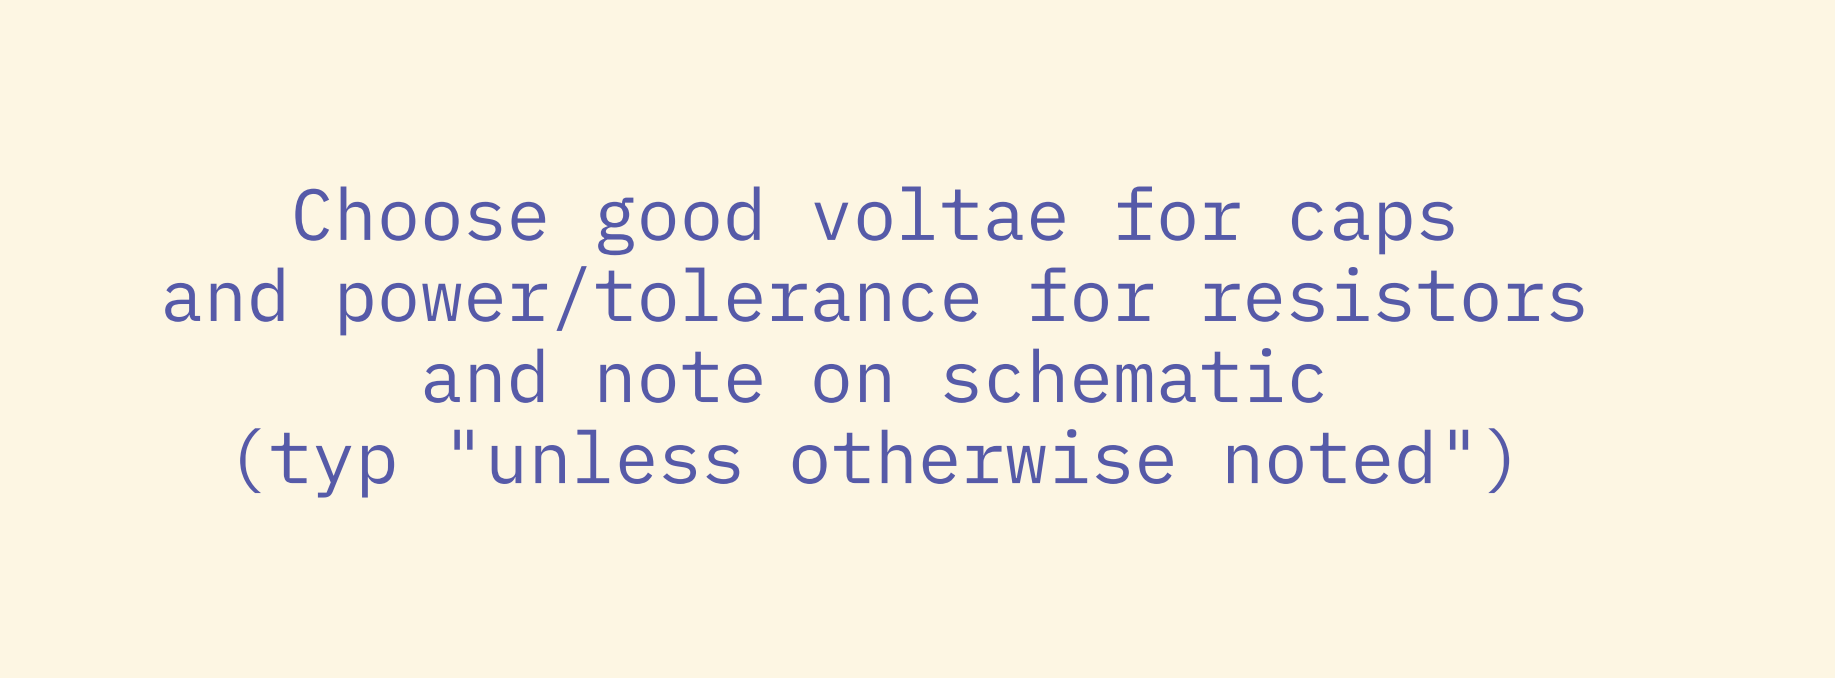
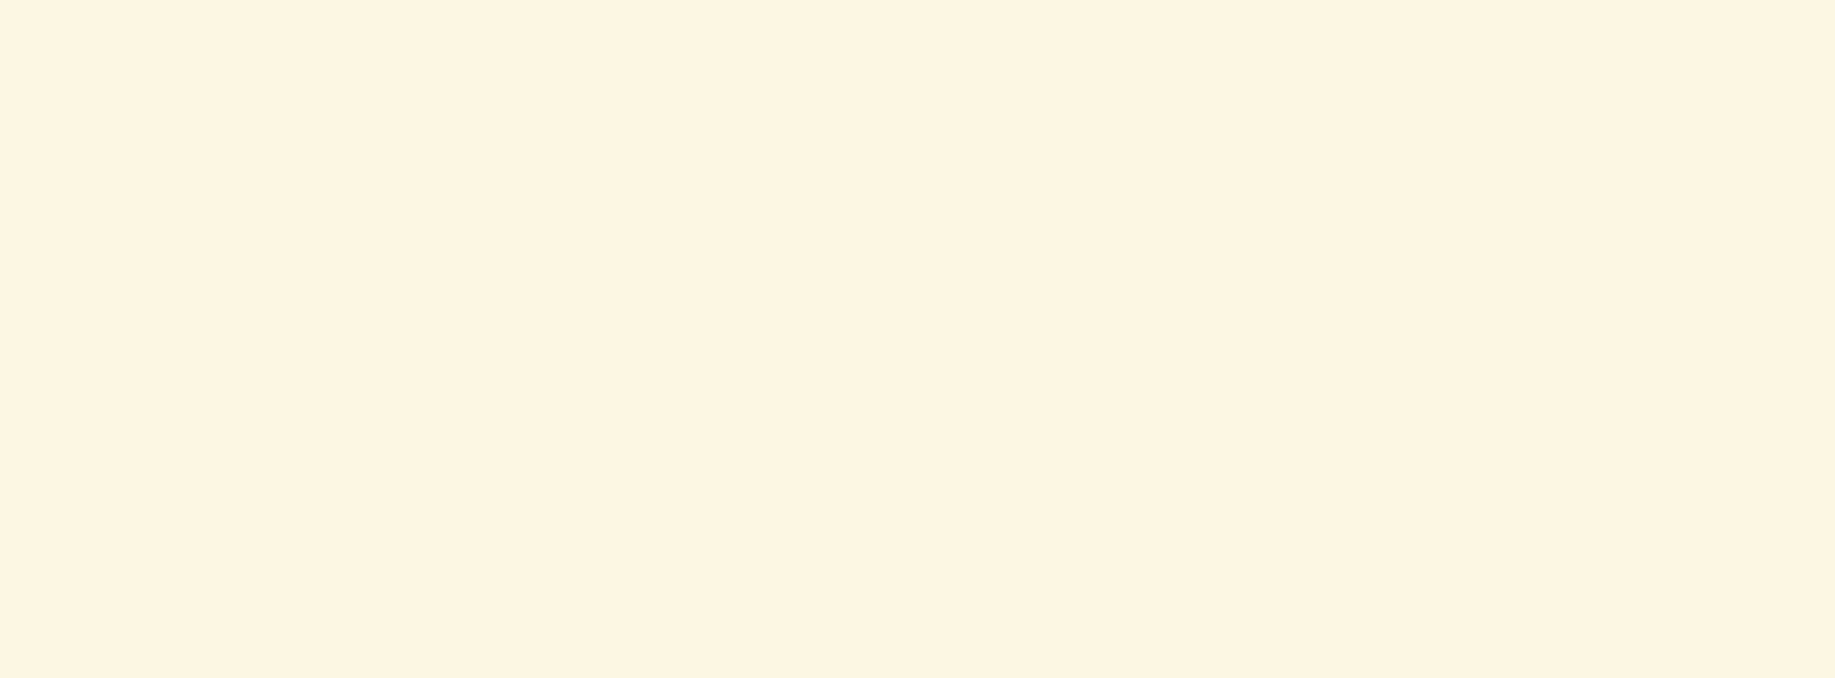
text: Choose good voltae for caps (874, 220) -> none
text: and power/tolerance for resistors (874, 300) -> none
text: and note on schematic (873, 375) -> none
text: (typ "unless otherwise noted") (874, 462) -> none

